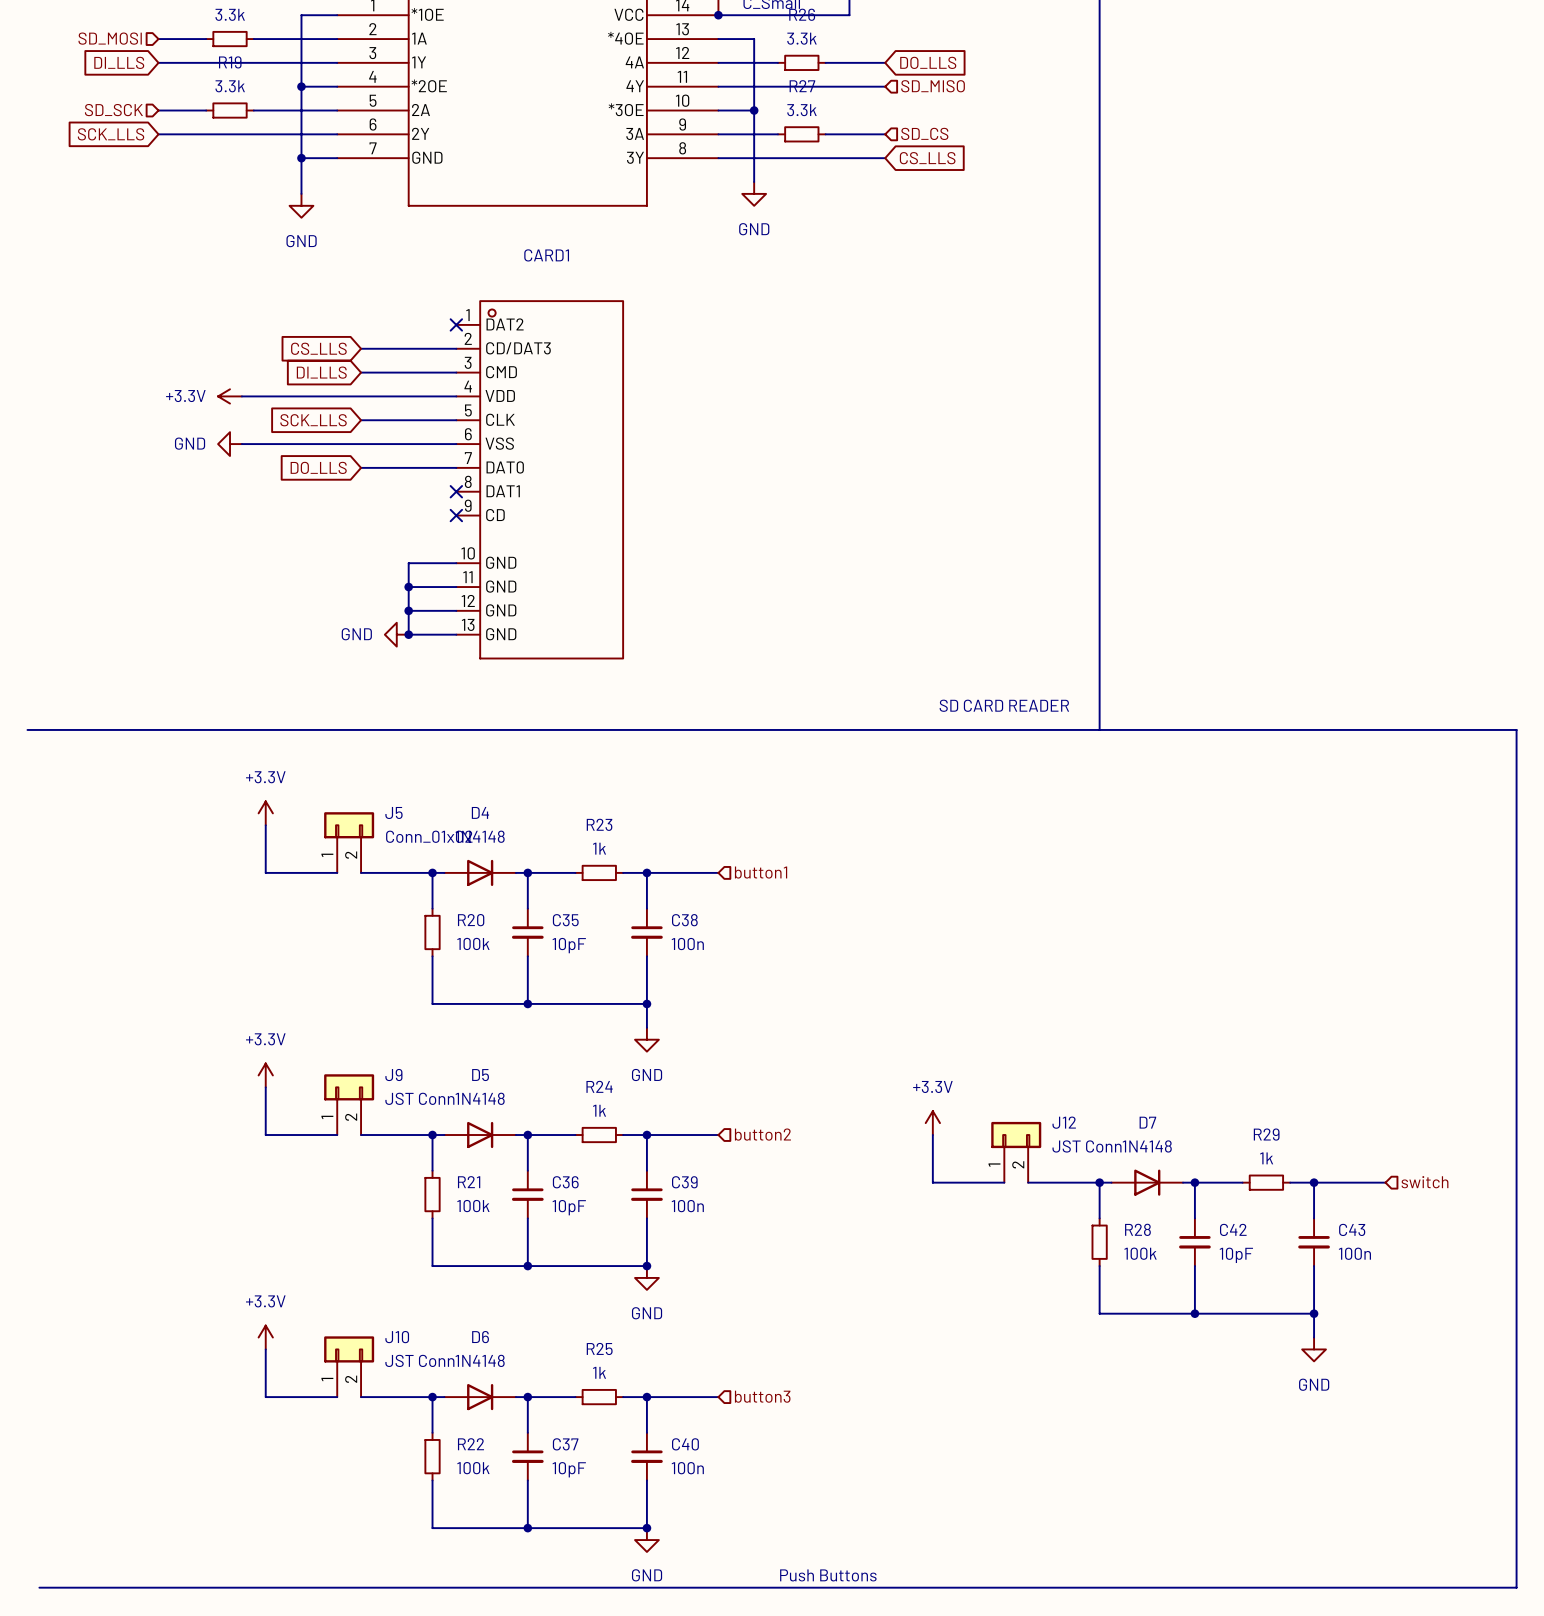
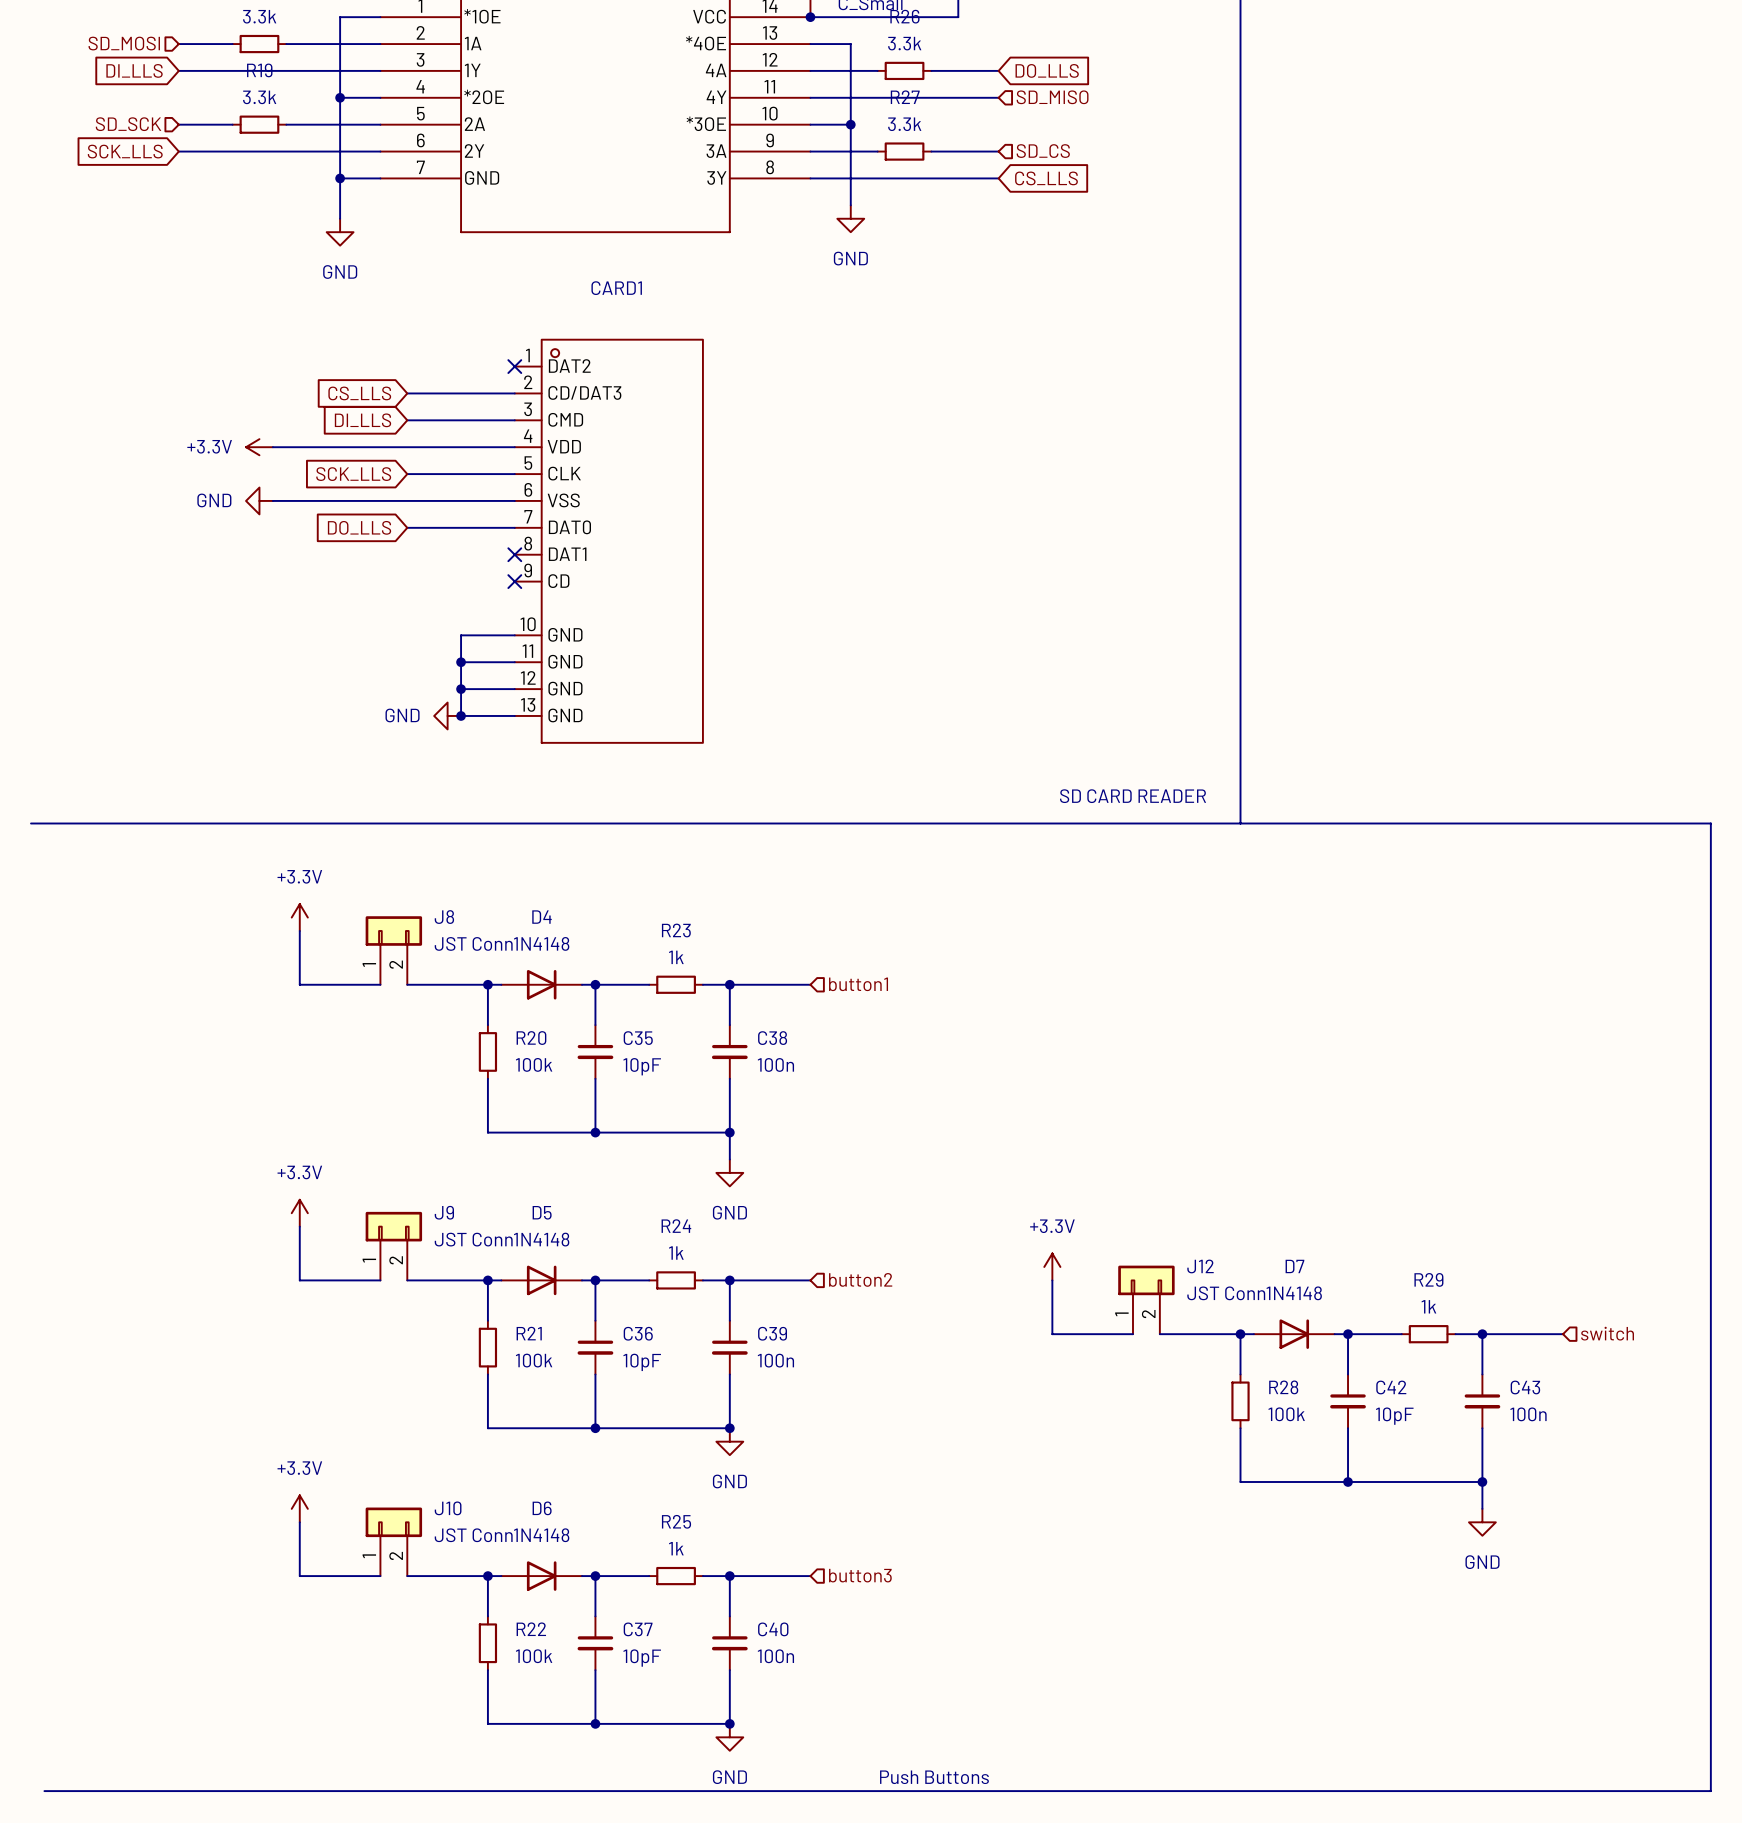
J5 name: J5 (393, 812) -> J8 (444, 917)
J5 value: Conn_01x02 (429, 836) -> JST Conn (473, 943)

